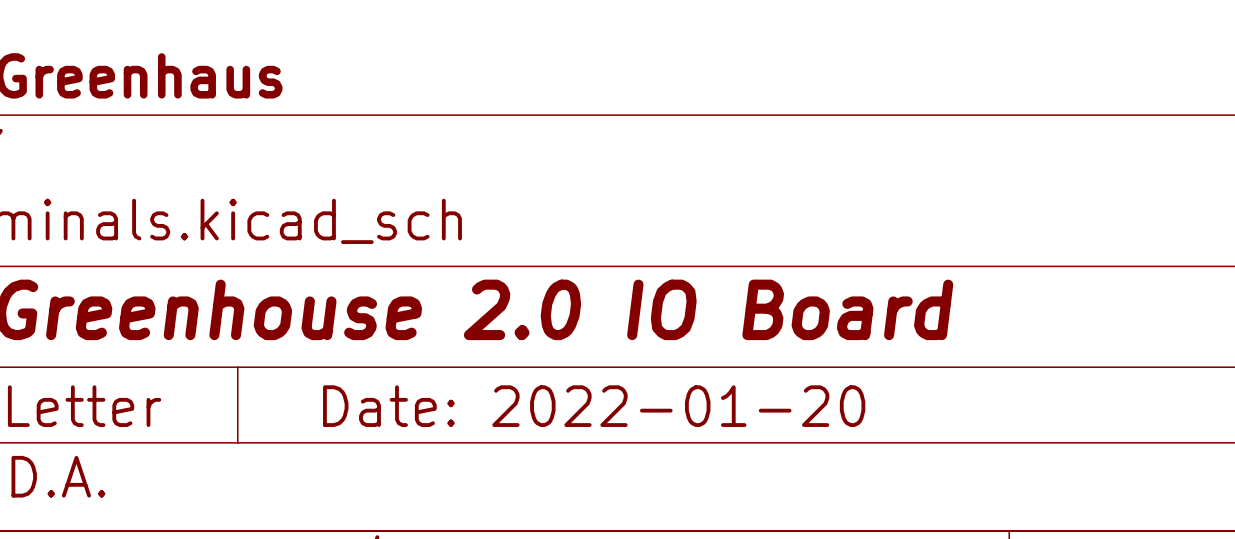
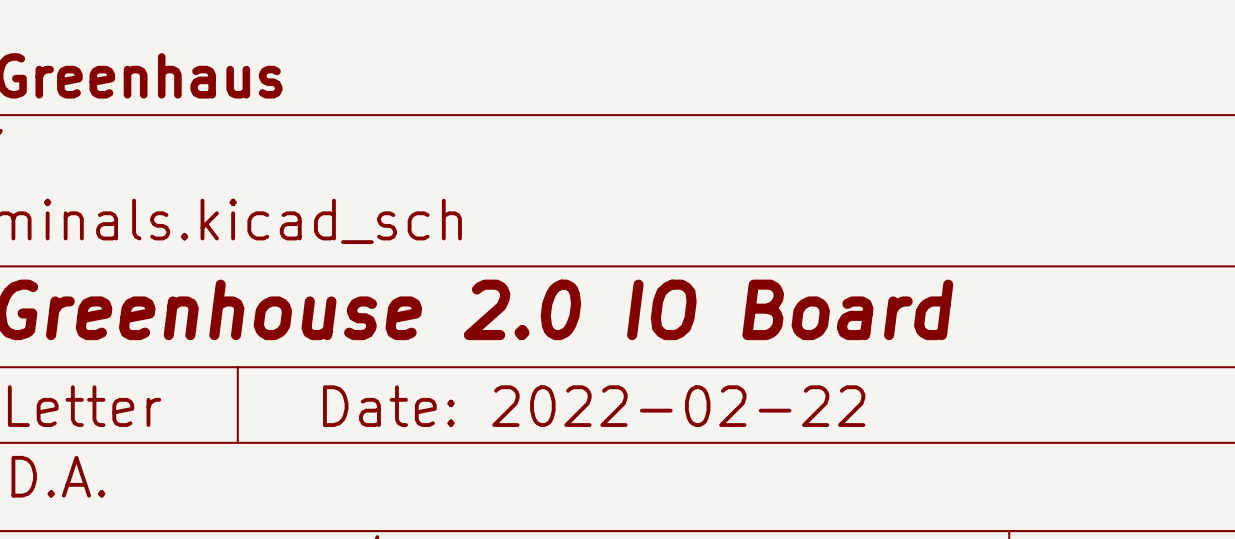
title block: Date: 2022-01-20 (594, 406) -> Date: 2022-02-22 (594, 406)

